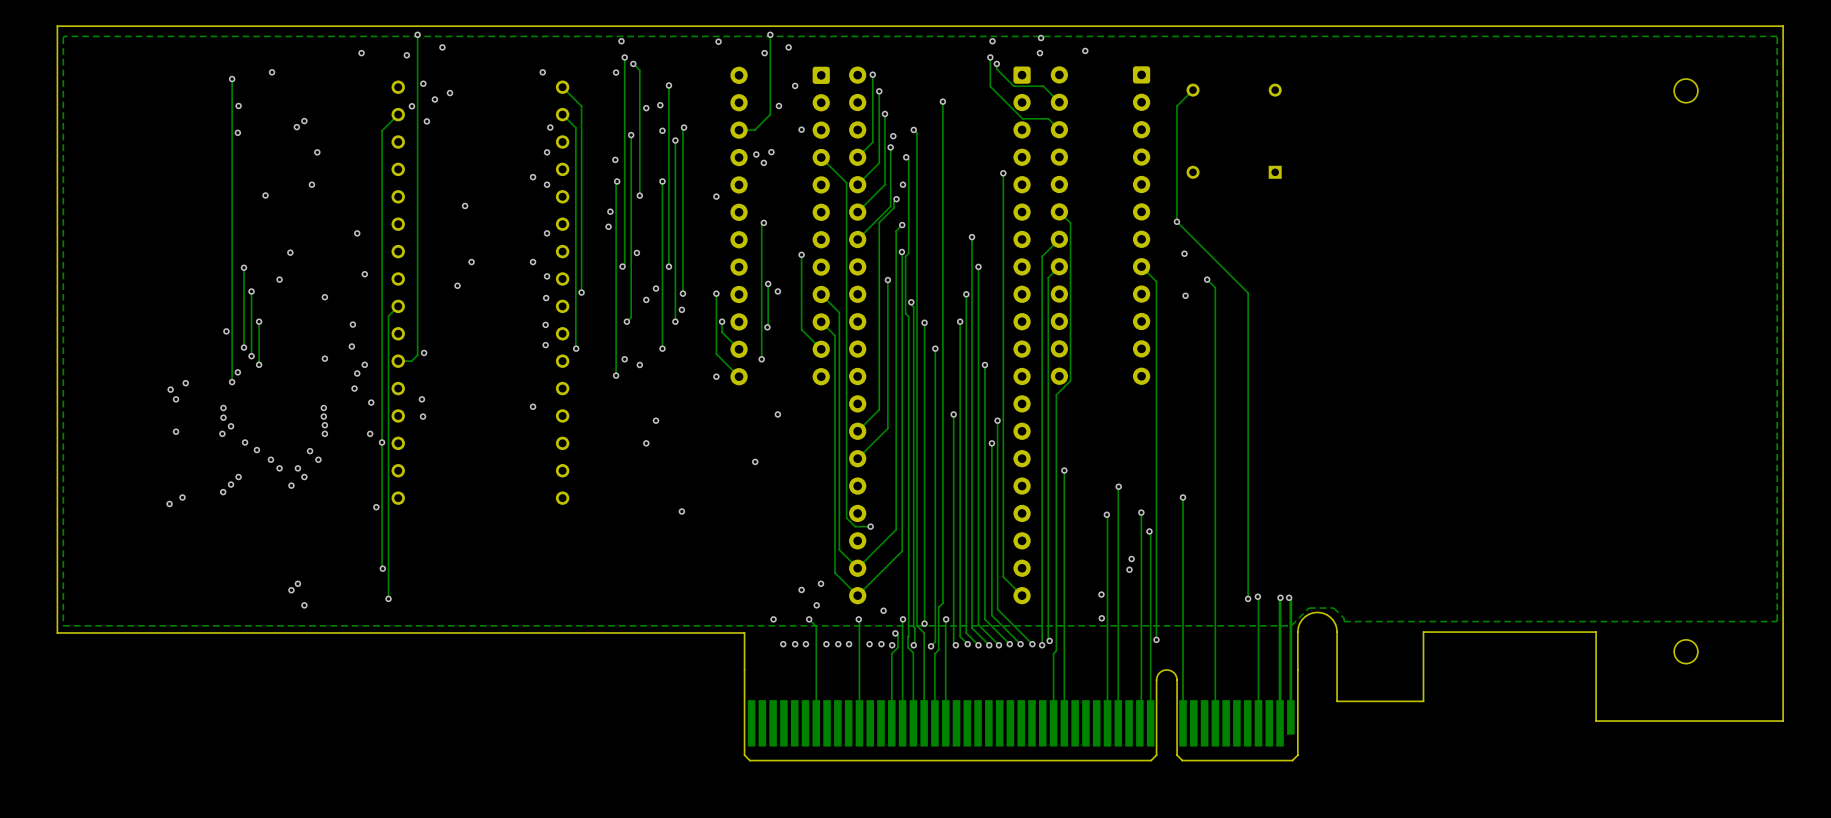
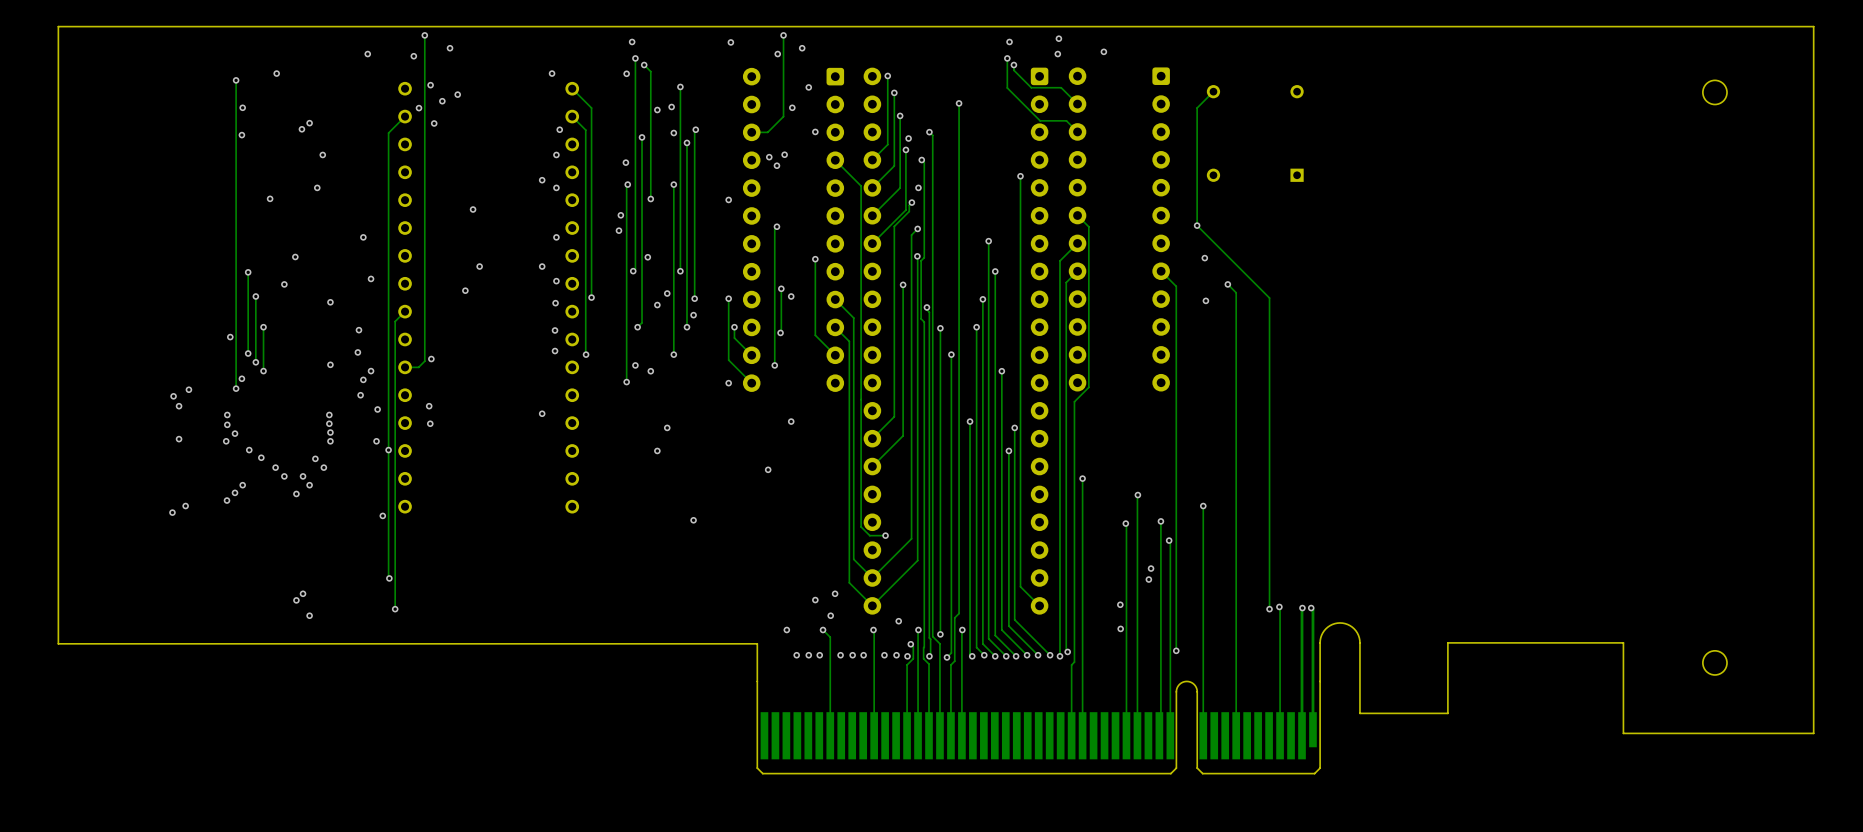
zone outline: (1777, 36) (1776, 621) (1344, 621) (1344, 618) (1333, 608) (1309, 608) (1291, 625) (63, 625) (64, 36) (1777, 36) -> none

